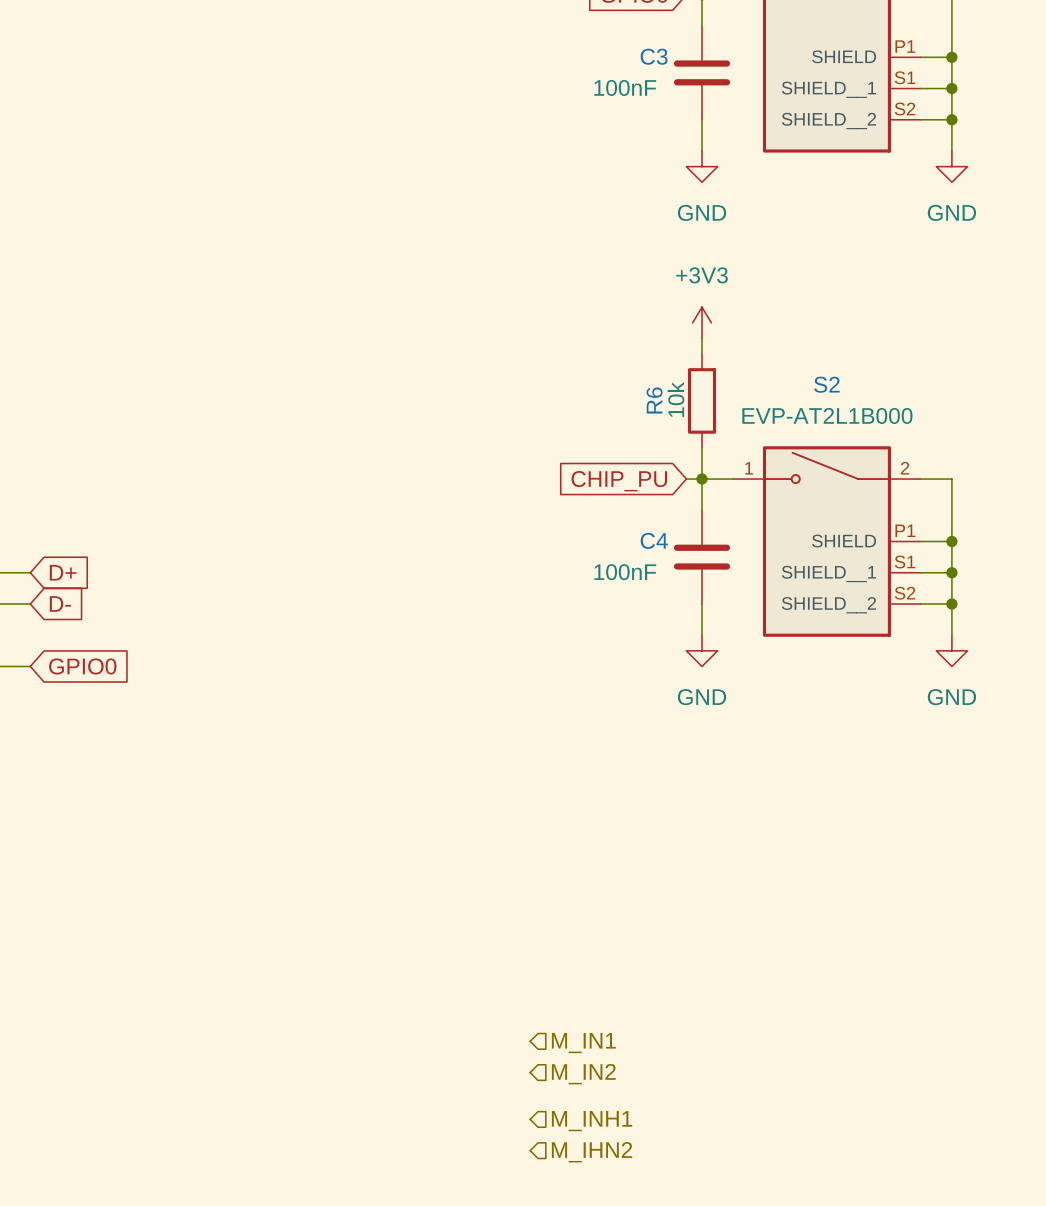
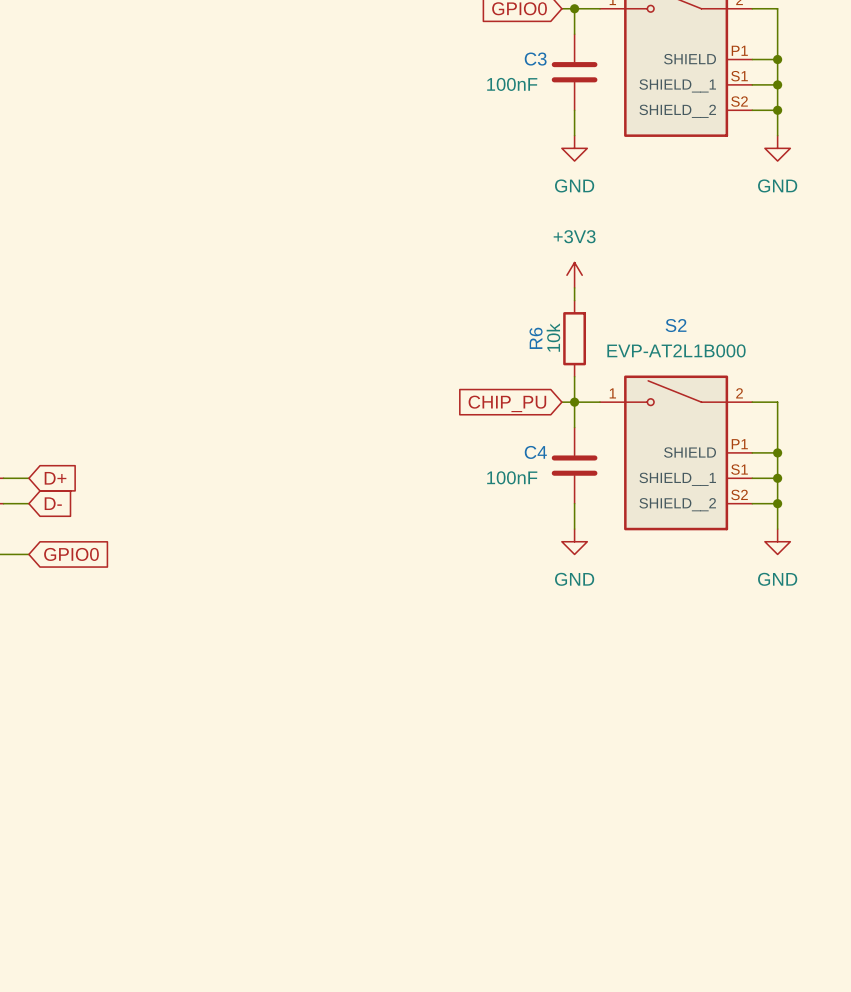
hierarchical label: M_IN1 (583, 1043) -> none
hierarchical label: M_IN2 (583, 1074) -> none
hierarchical label: M_INH1 (592, 1121) -> none
hierarchical label: M_IHN2 (592, 1152) -> none

